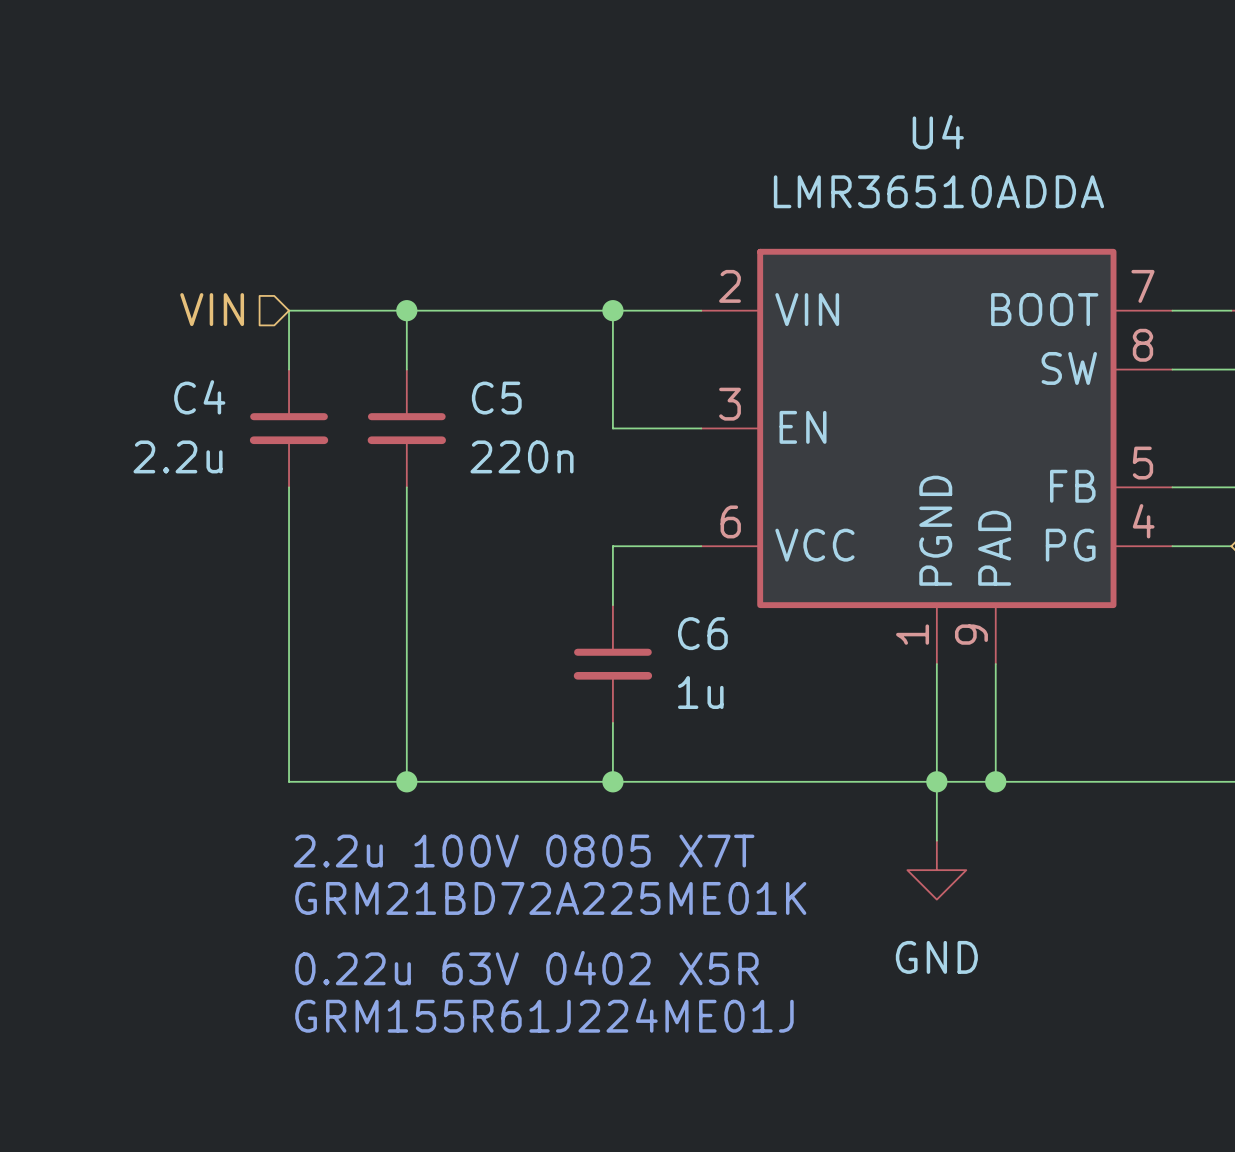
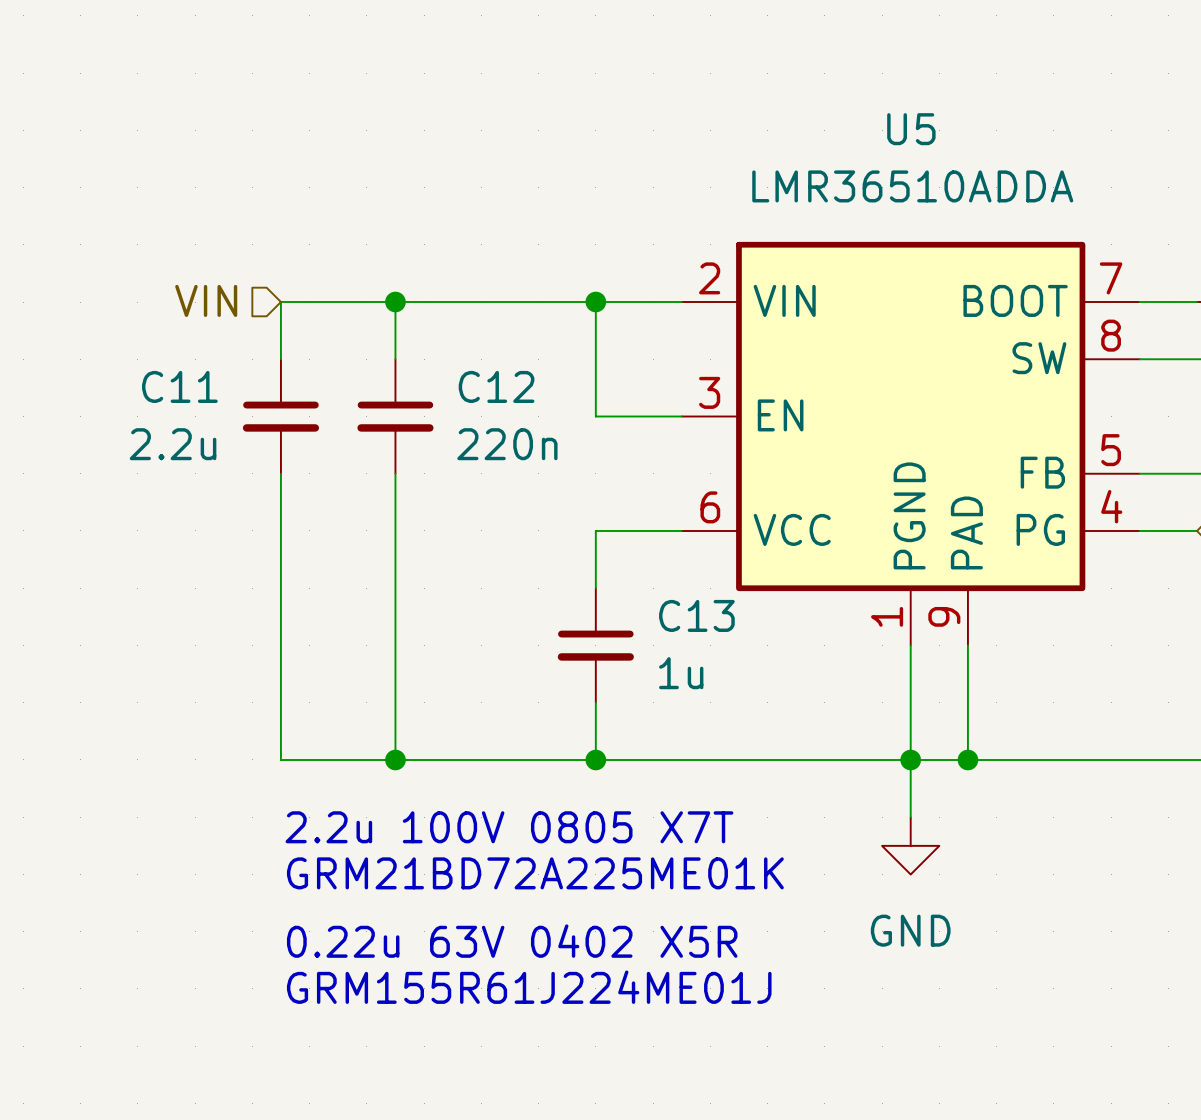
U4 name: U4 (938, 132) -> U5 (911, 129)
C4 name: C4 (199, 397) -> C11 (179, 386)
C5 name: C5 (496, 398) -> C12 (496, 386)
C6 name: C6 (702, 633) -> C13 (696, 615)

